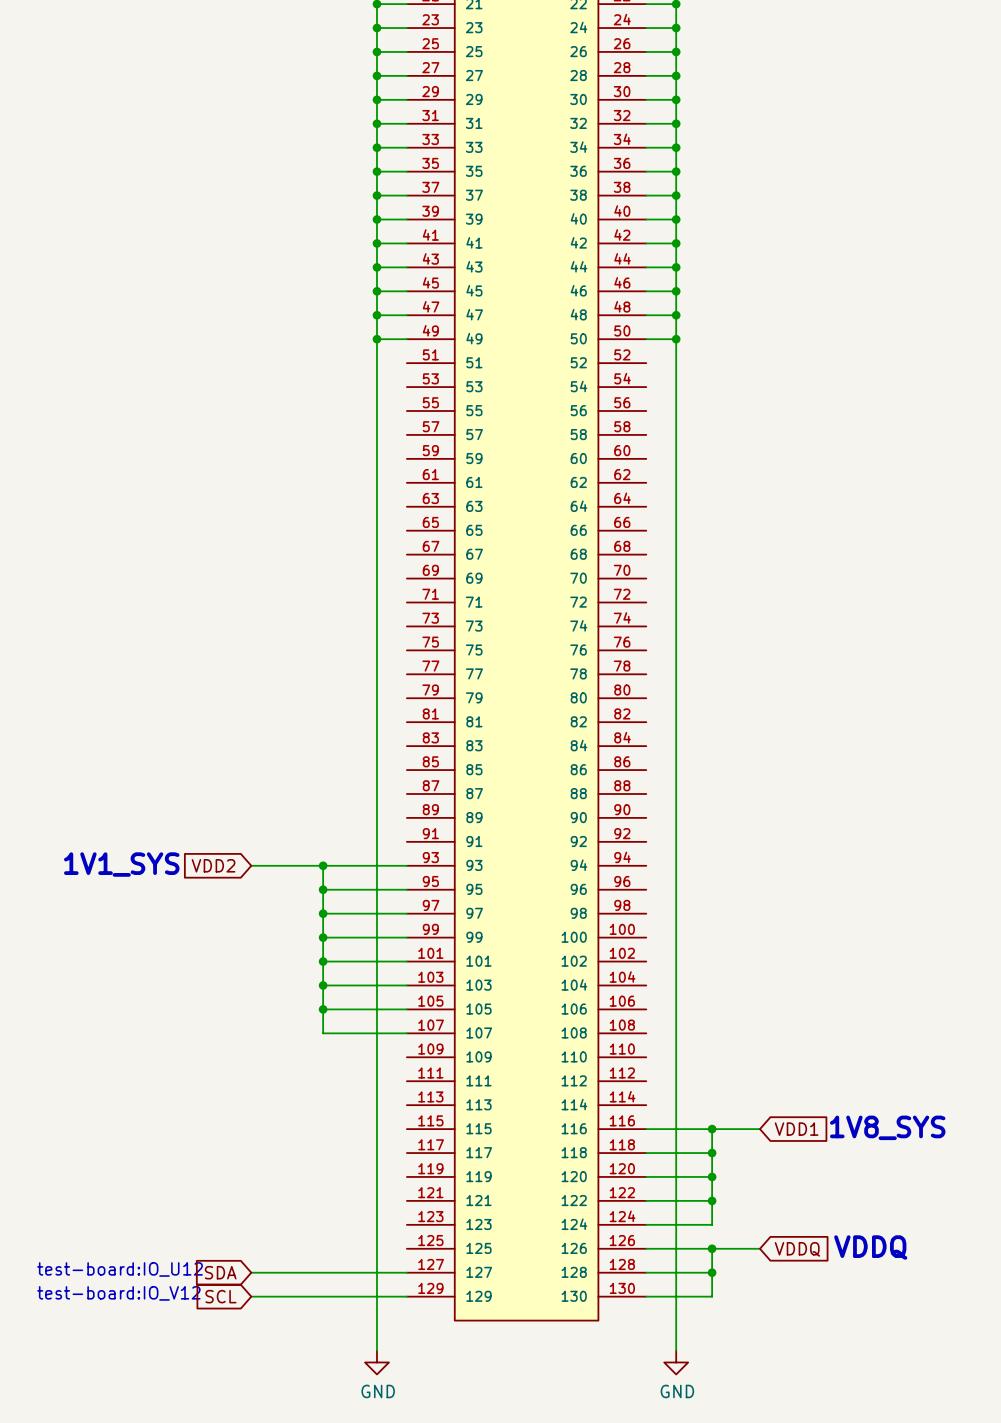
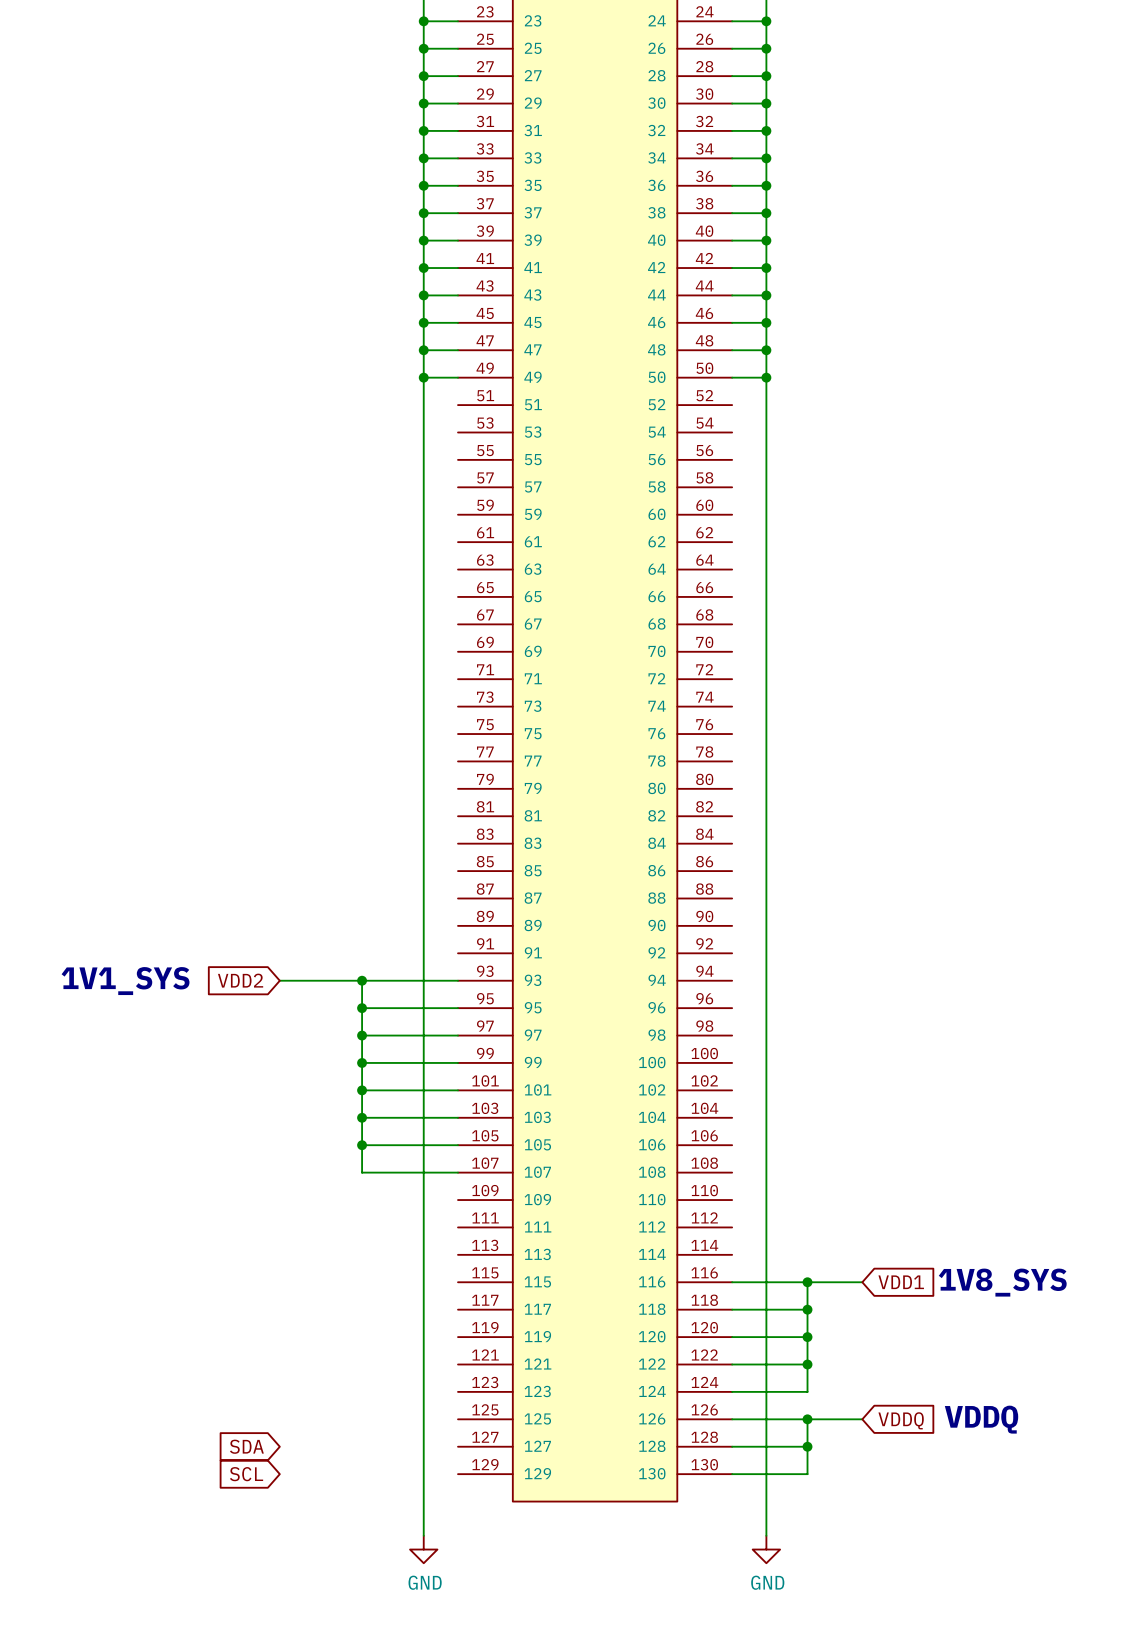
text: test-board:IO_U12 (120, 1269) -> none
wire: (251, 1272) (406, 1272) -> none
text: test-board:IO_V12 (118, 1293) -> none
wire: (251, 1296) (406, 1296) -> none

